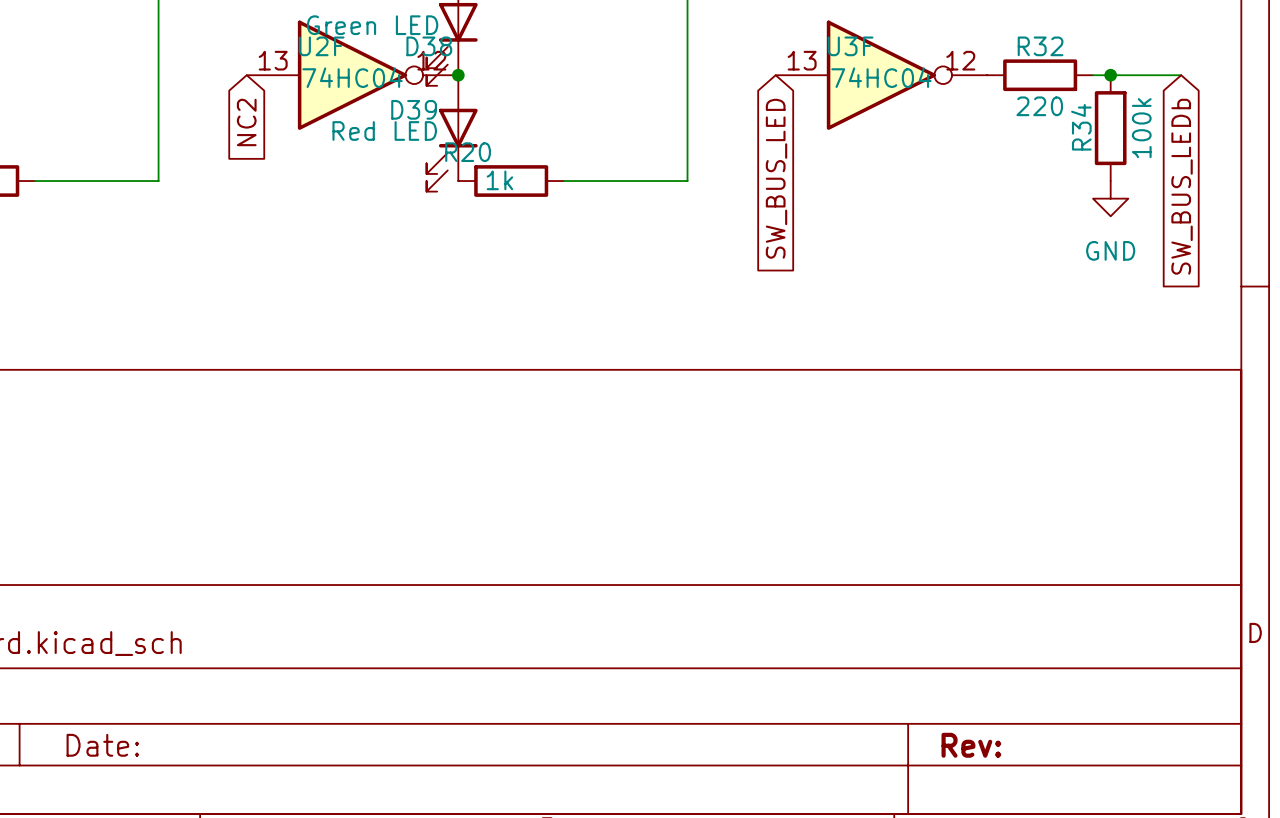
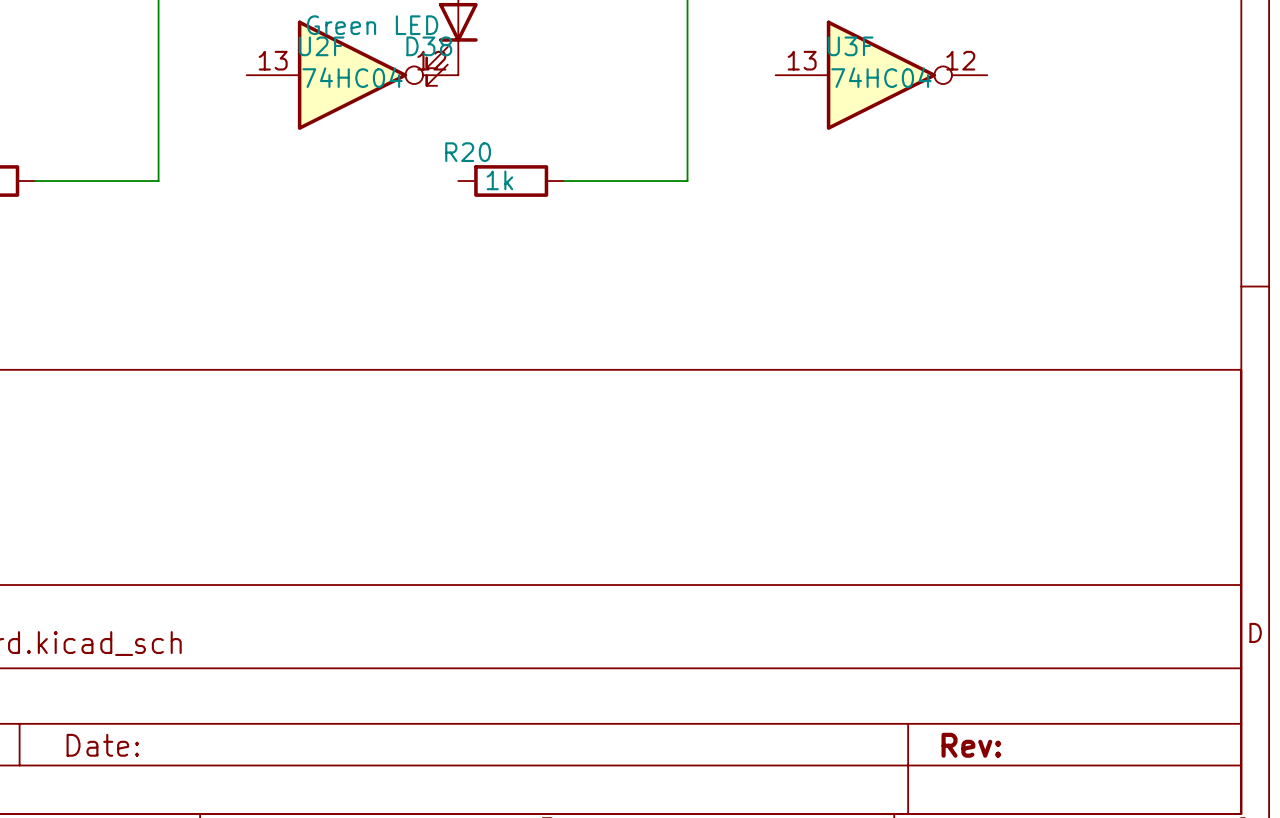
junction: (458, 75) -> none
R32: 220 (1040, 75) -> none
wire: (1093, 75) (1181, 75) -> none
junction: (1110, 75) -> none
global label: NC2 (246, 122) -> none
R34: 100k (1110, 128) -> none
D39: Red LED (452, 133) -> none
global label: SW_BUS_LED (776, 178) -> none
global label: SW_BUS_LEDb (1182, 186) -> none
power symbol: GND (1110, 198) -> none

